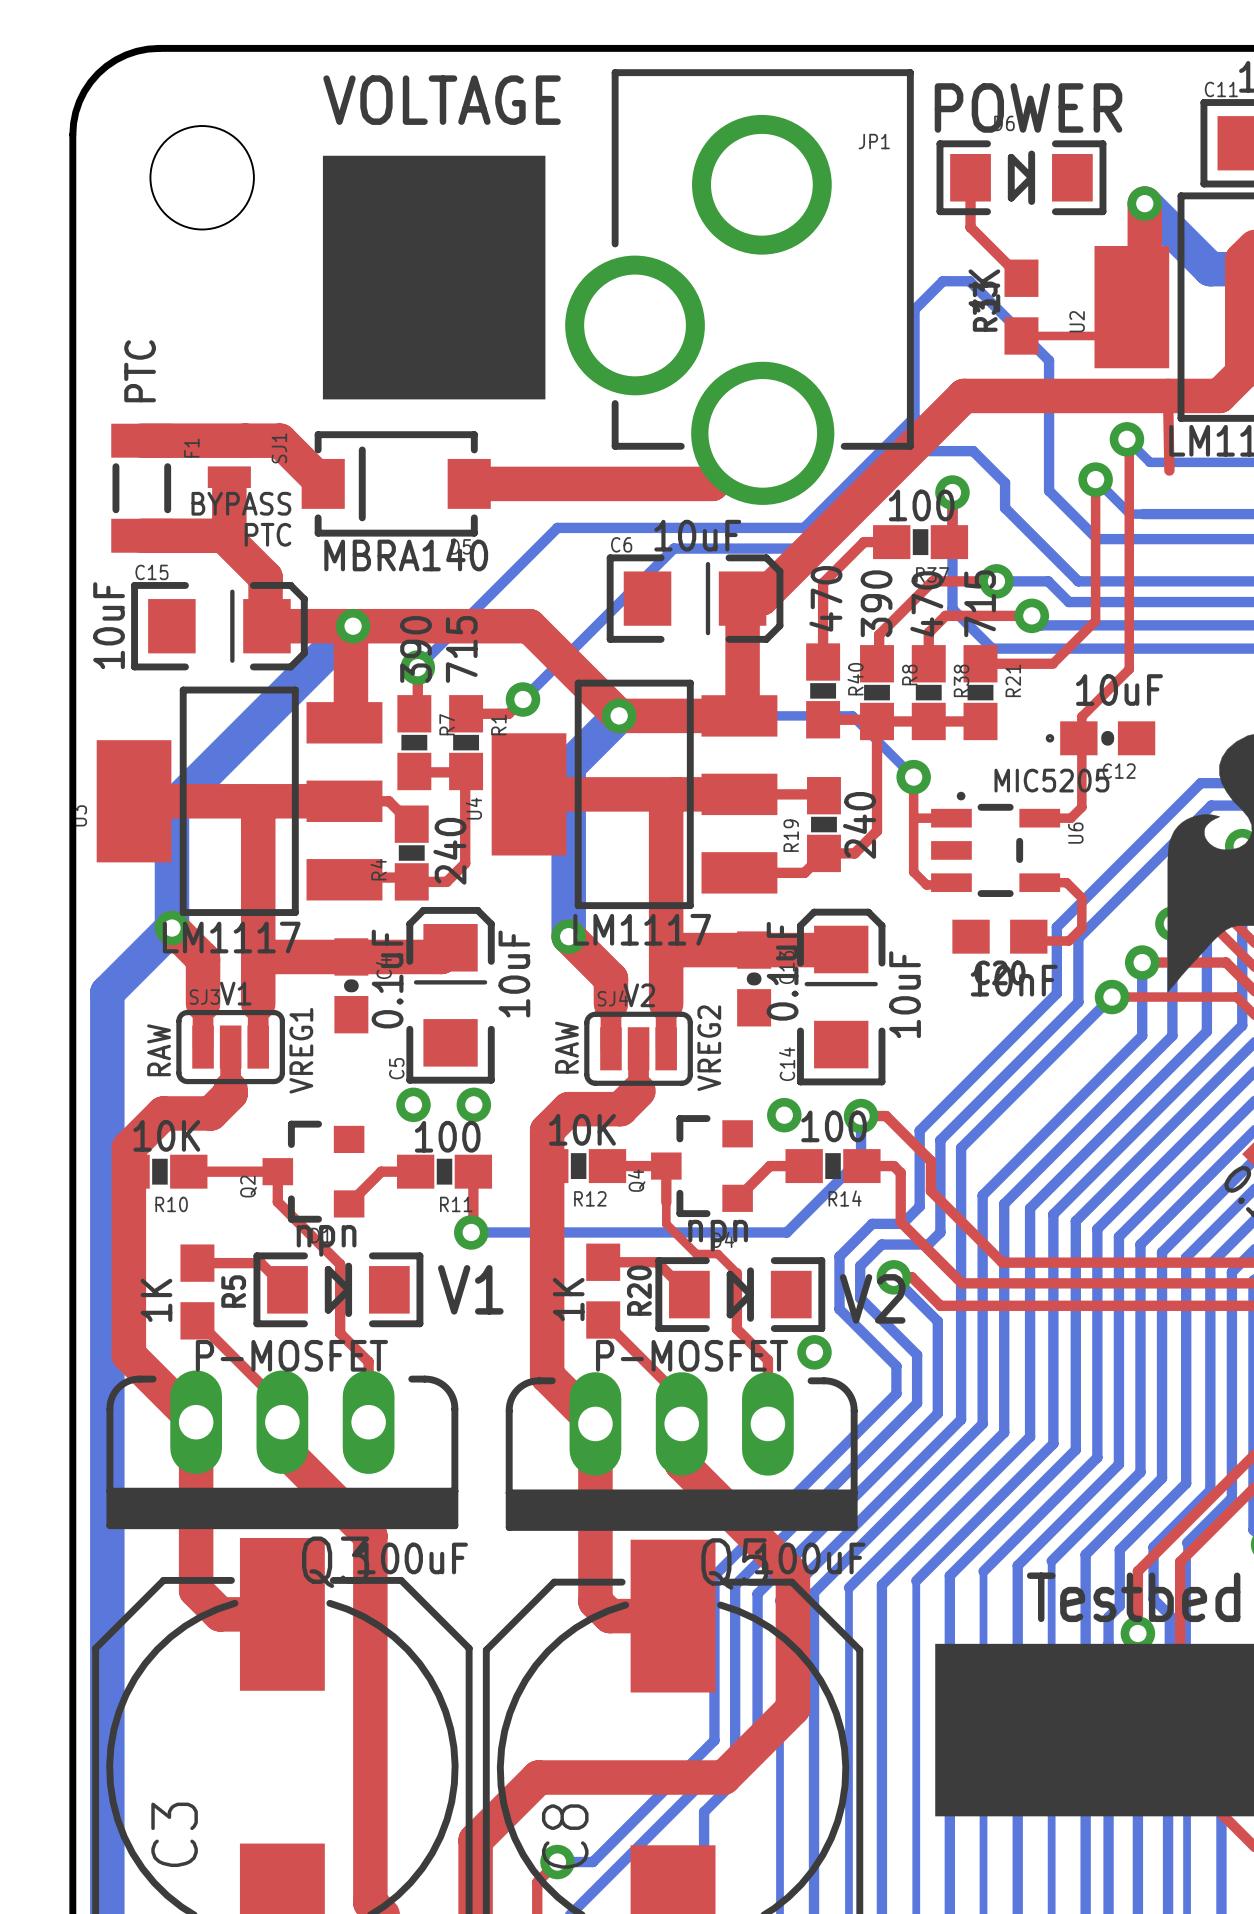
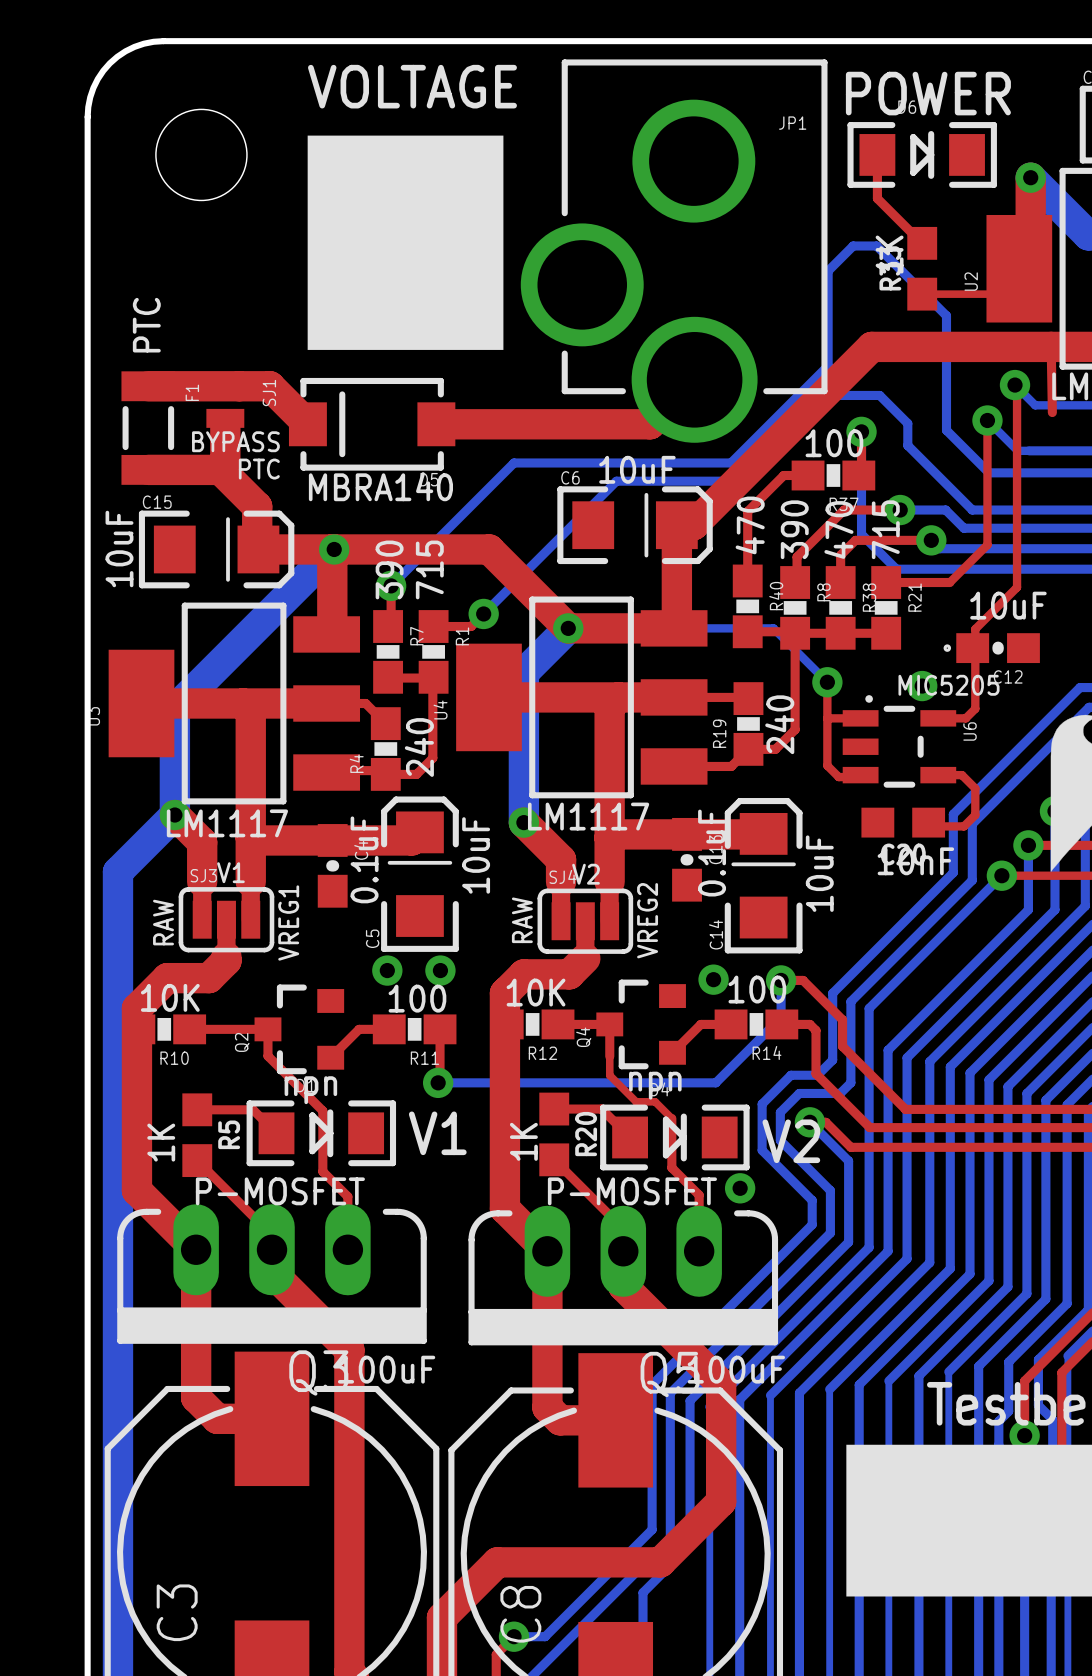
via: none -> (922, 686)

